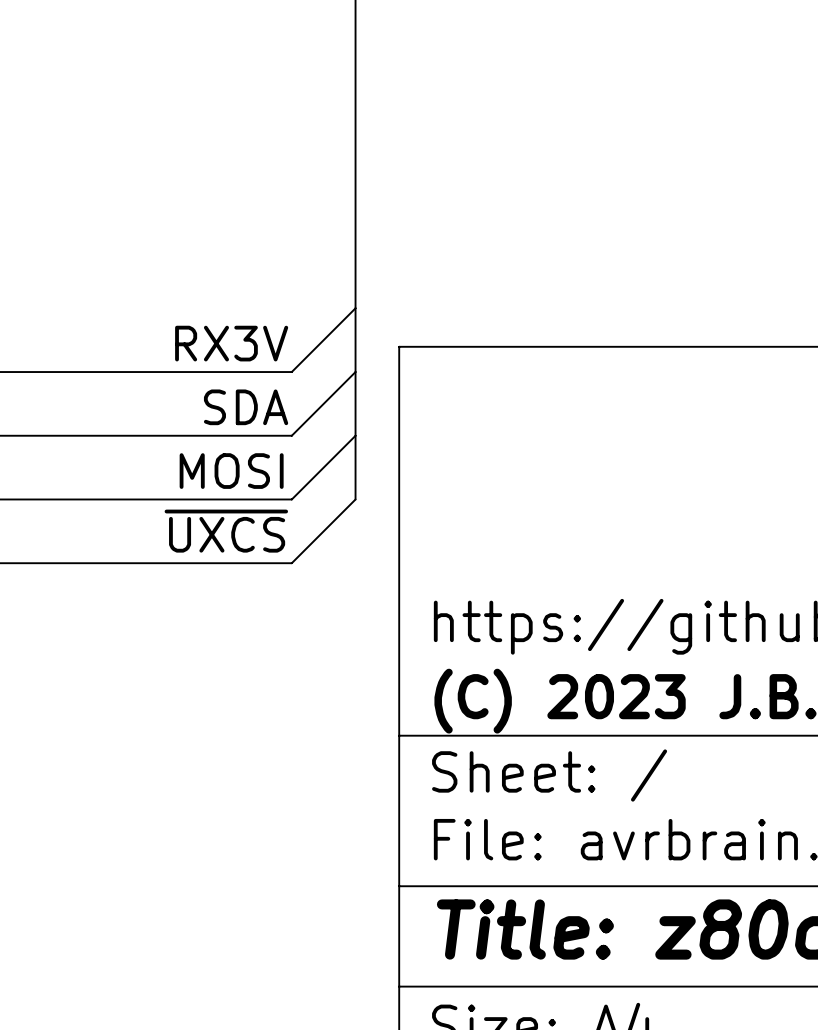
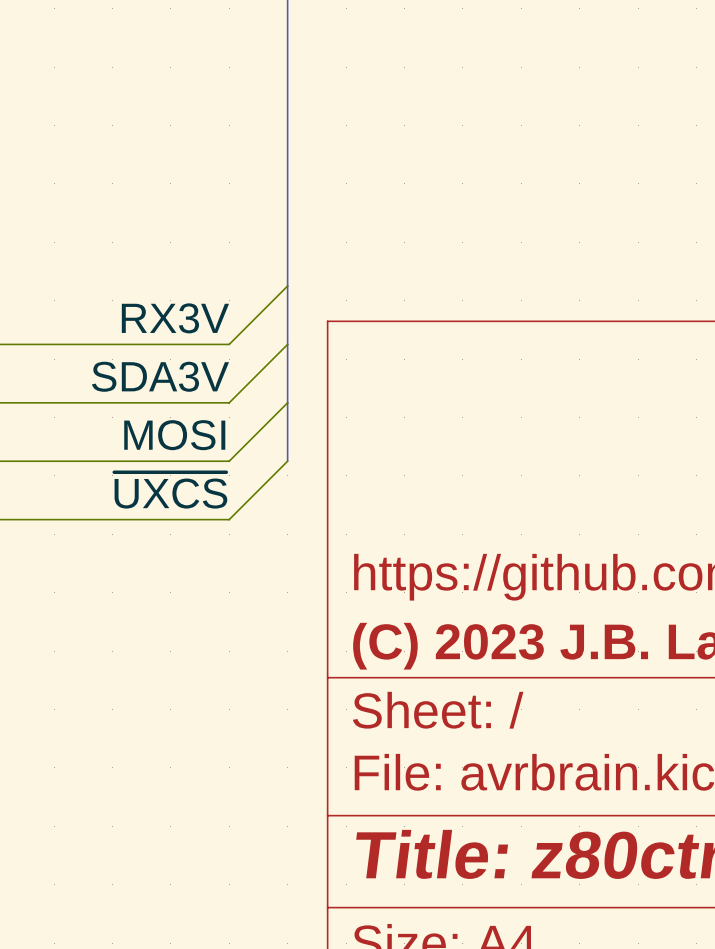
label: SDA (246, 407) -> SDA3V (160, 376)

